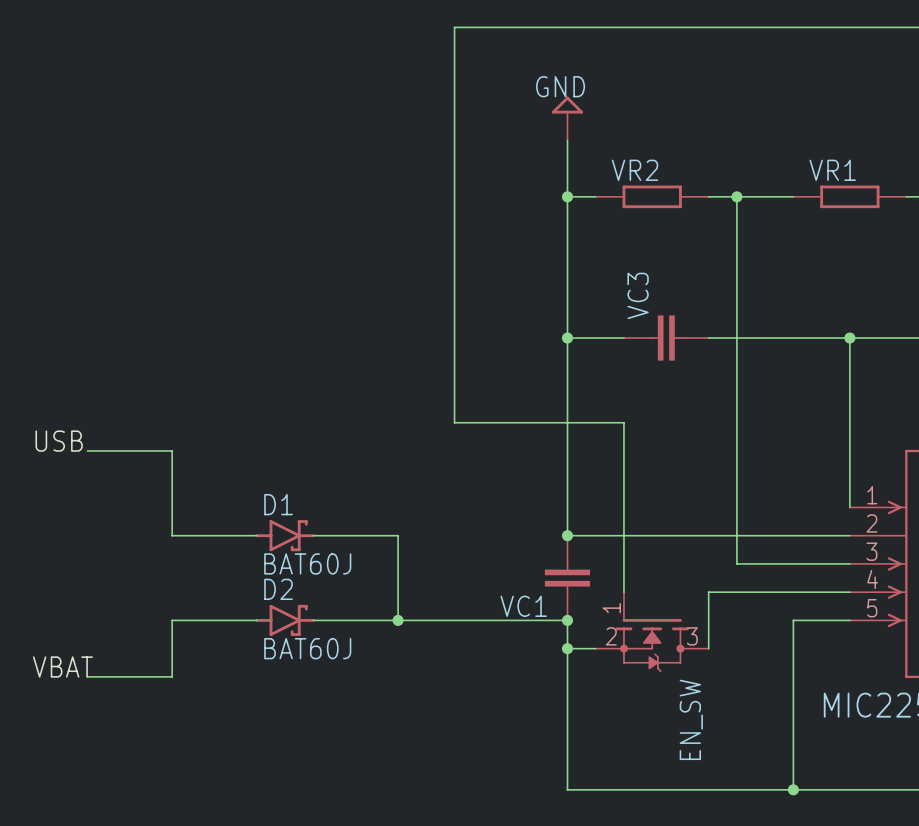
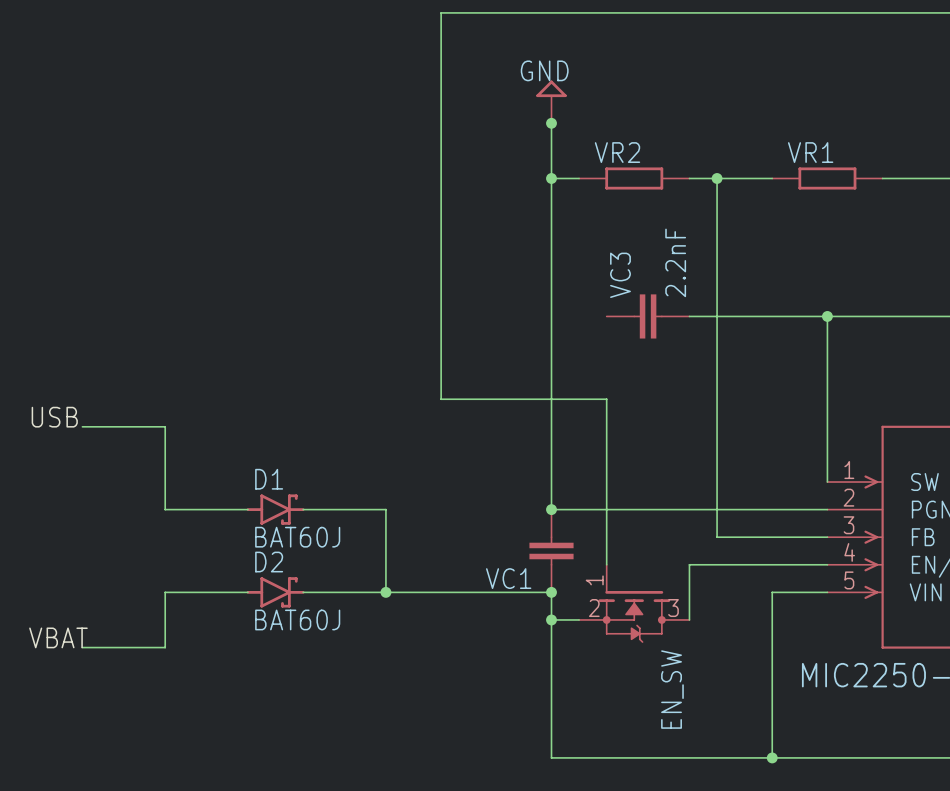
junction: none -> (551, 123)
VC3 value: none -> 2.2nF (675, 262)
wire: (567, 338) (623, 338) -> none
junction: (567, 338) -> none

